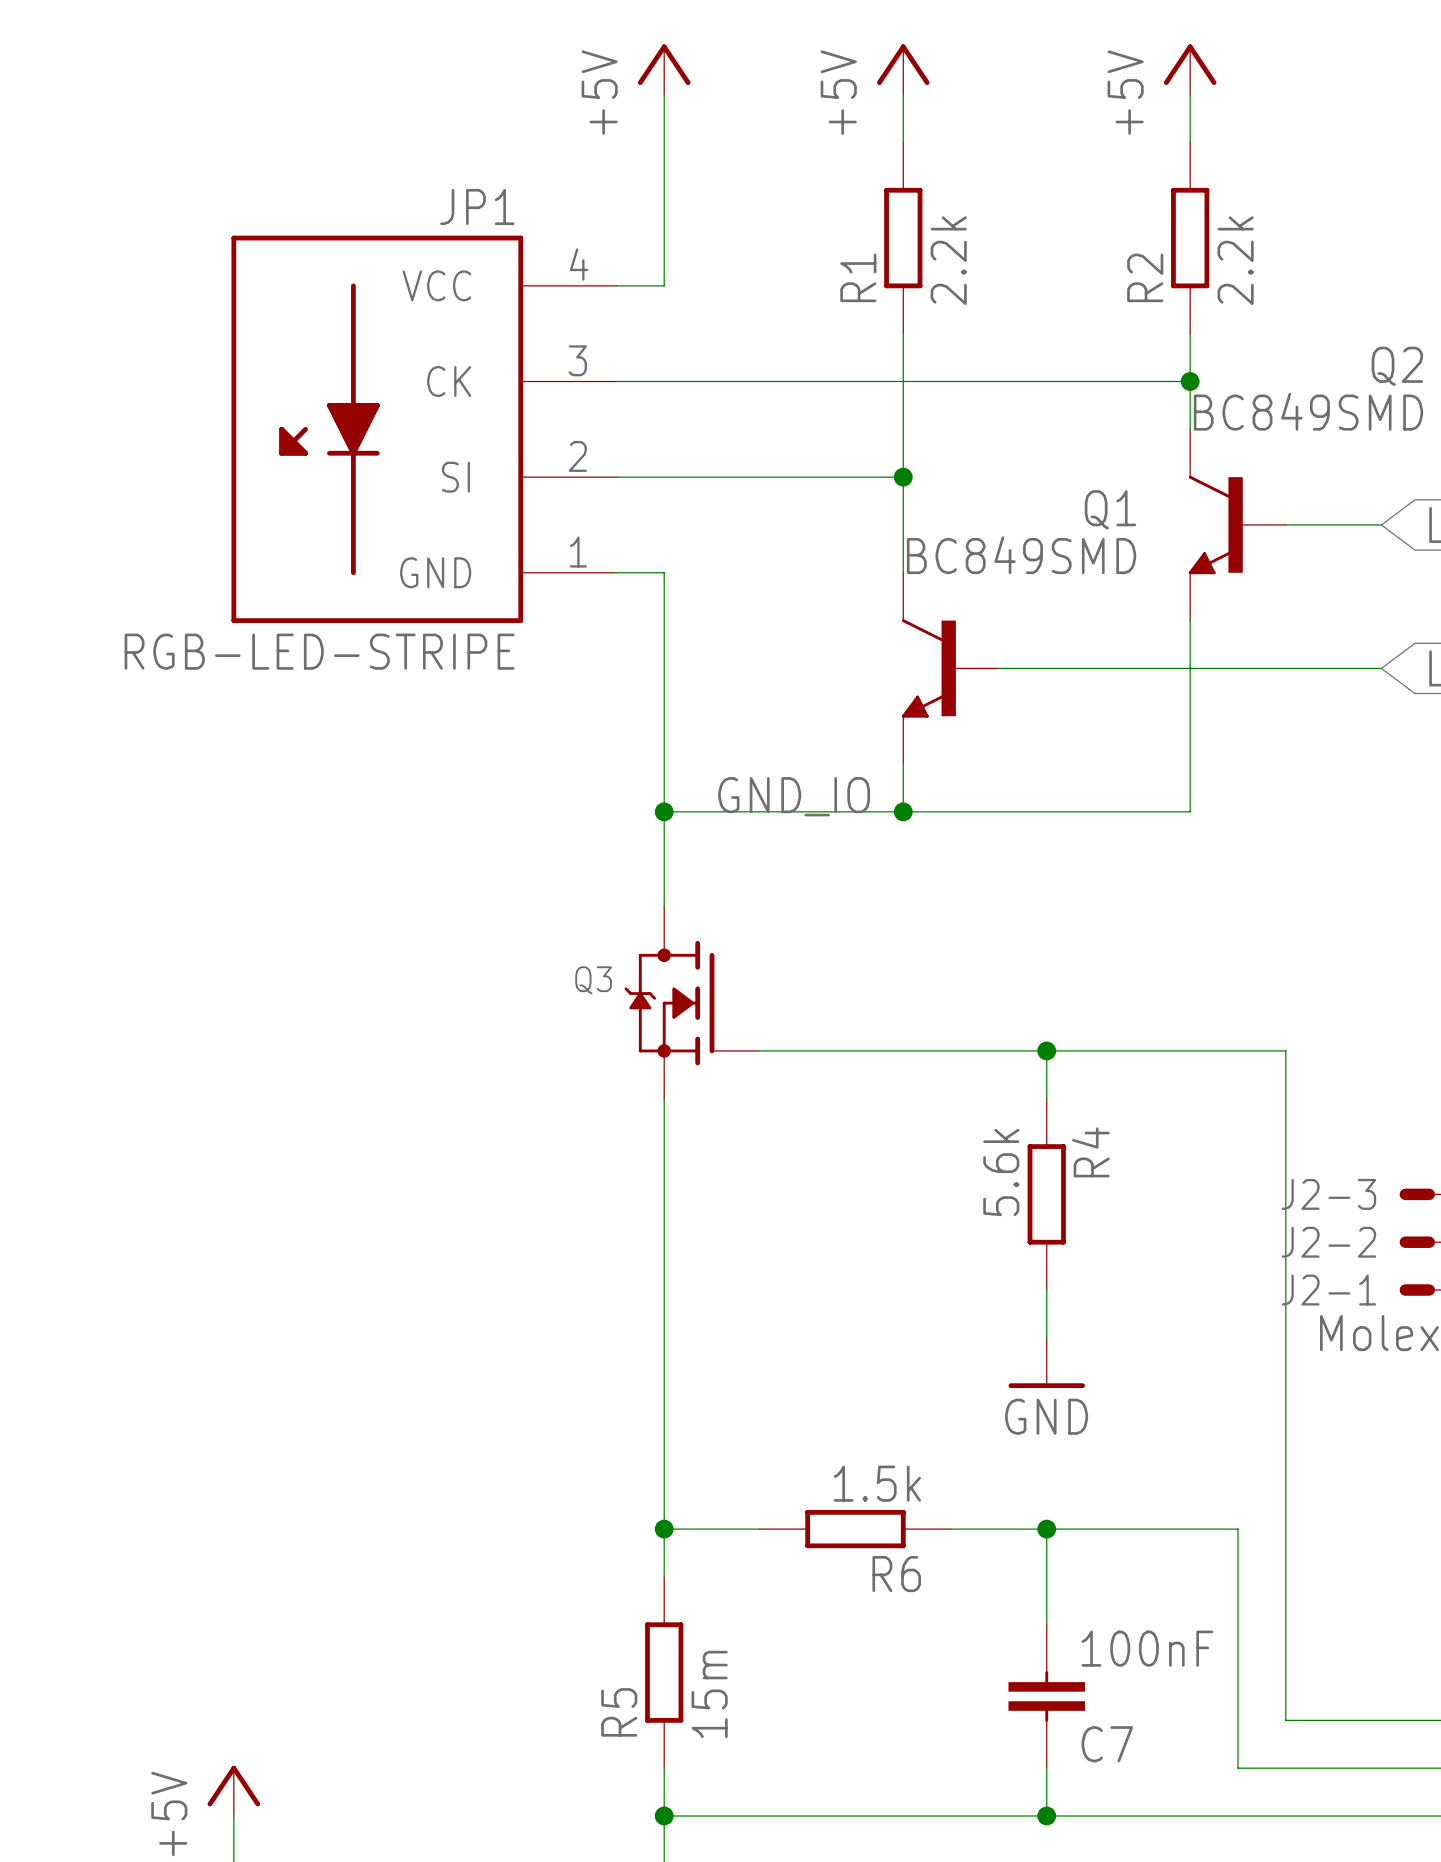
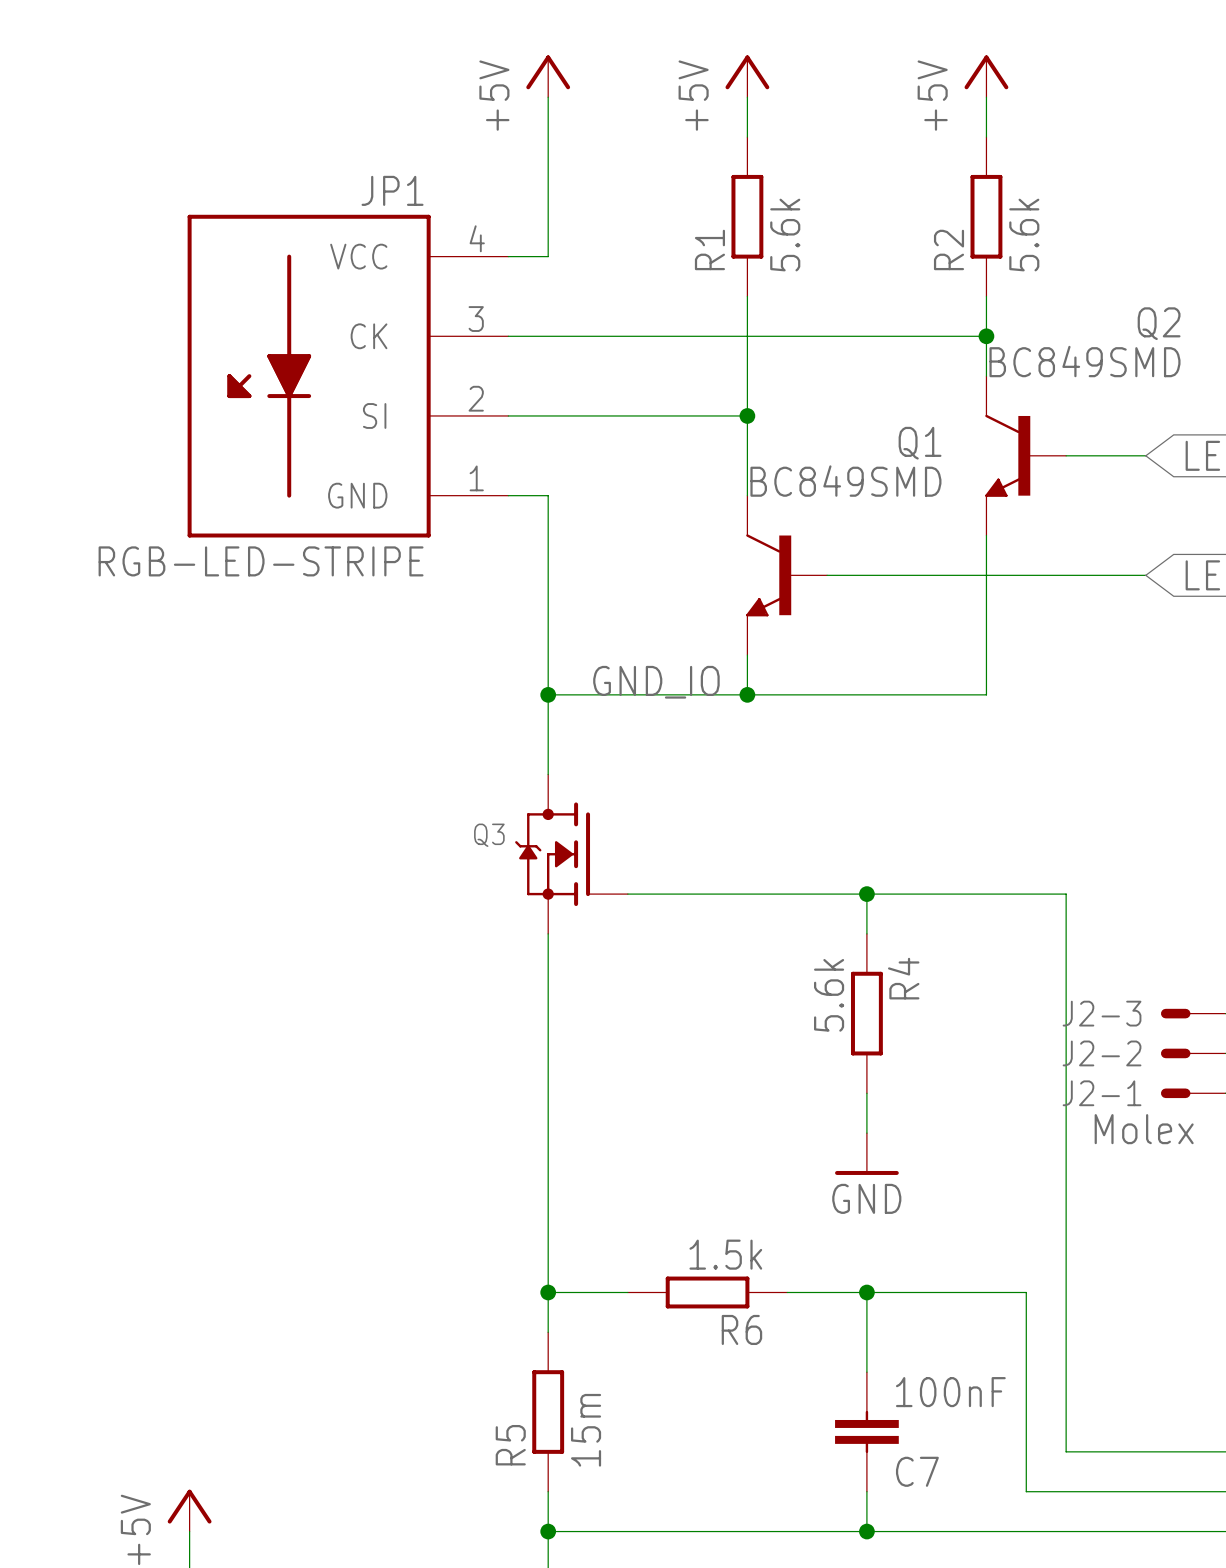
R1 value: 2.2k (948, 260) -> 5.6k (785, 235)
R2 value: 2.2k (1235, 260) -> 5.6k (1024, 235)

